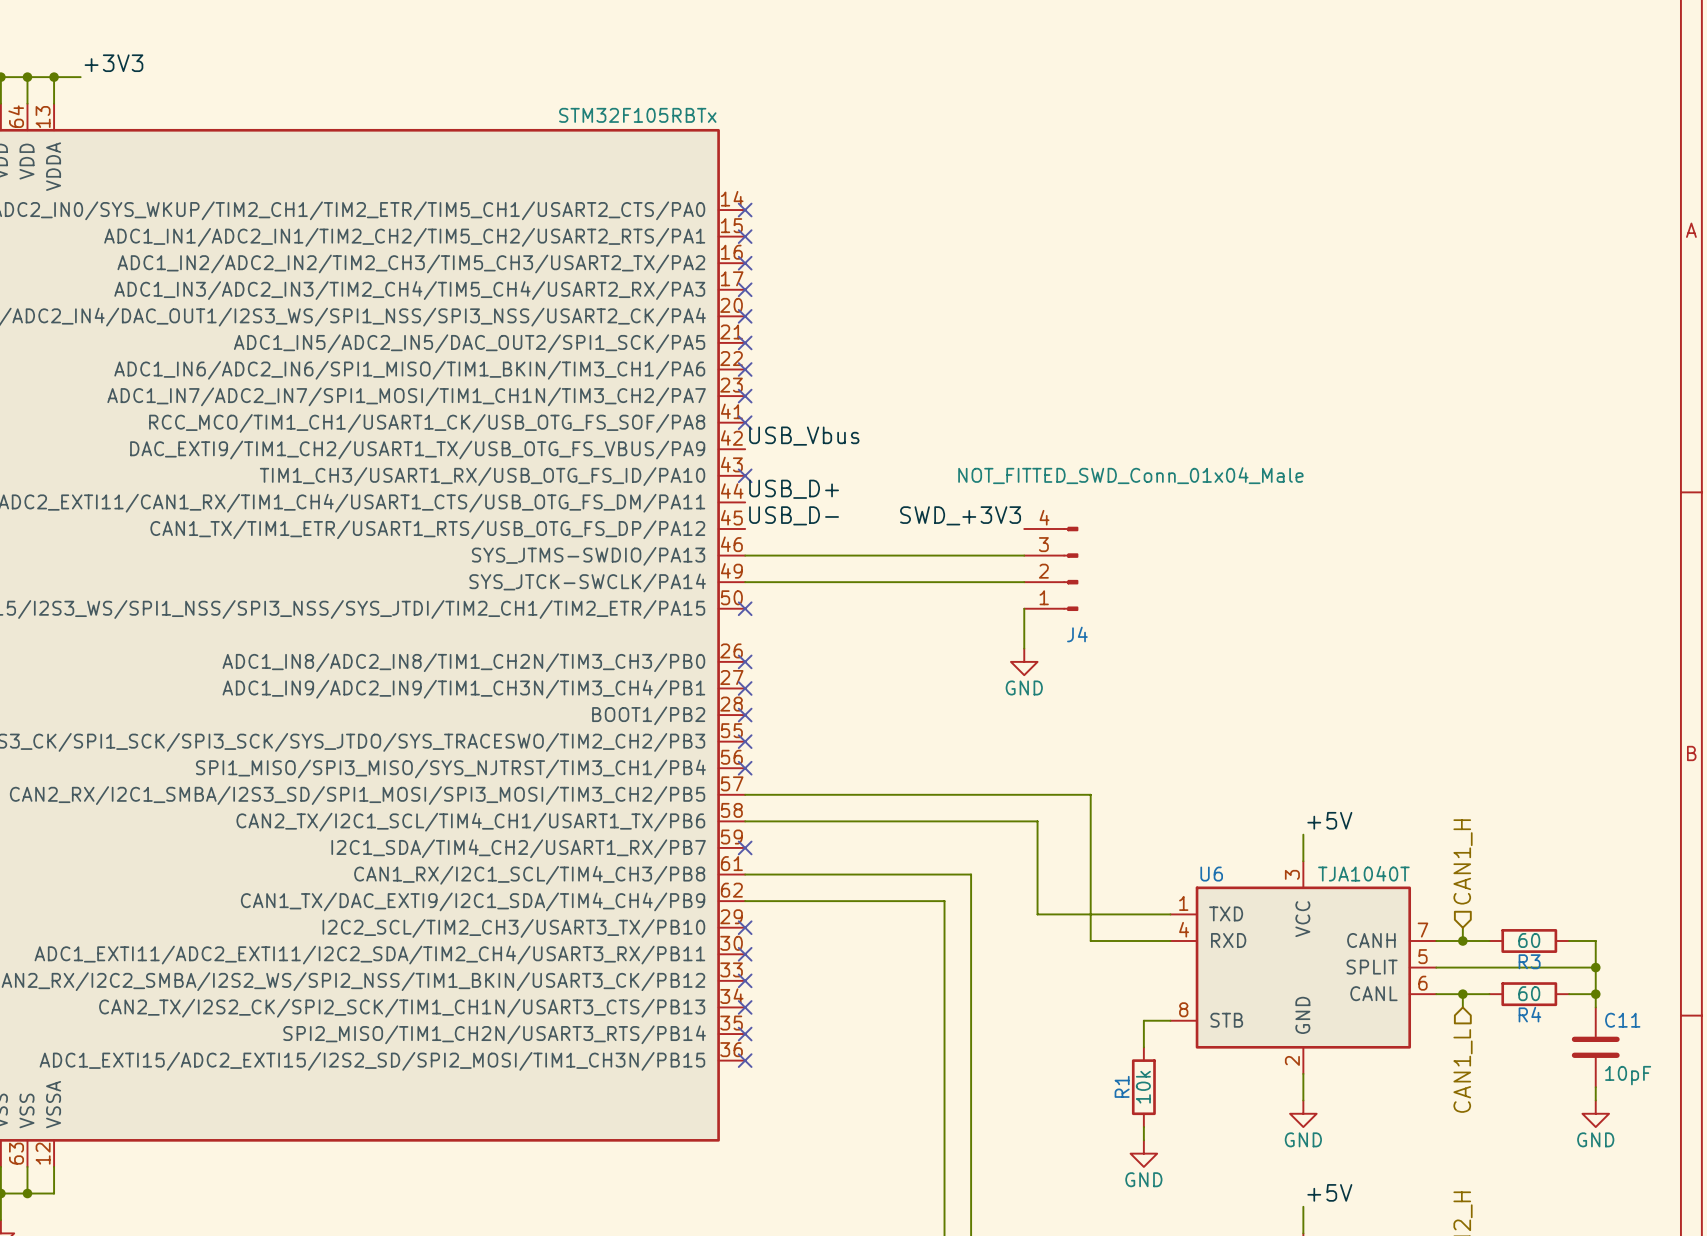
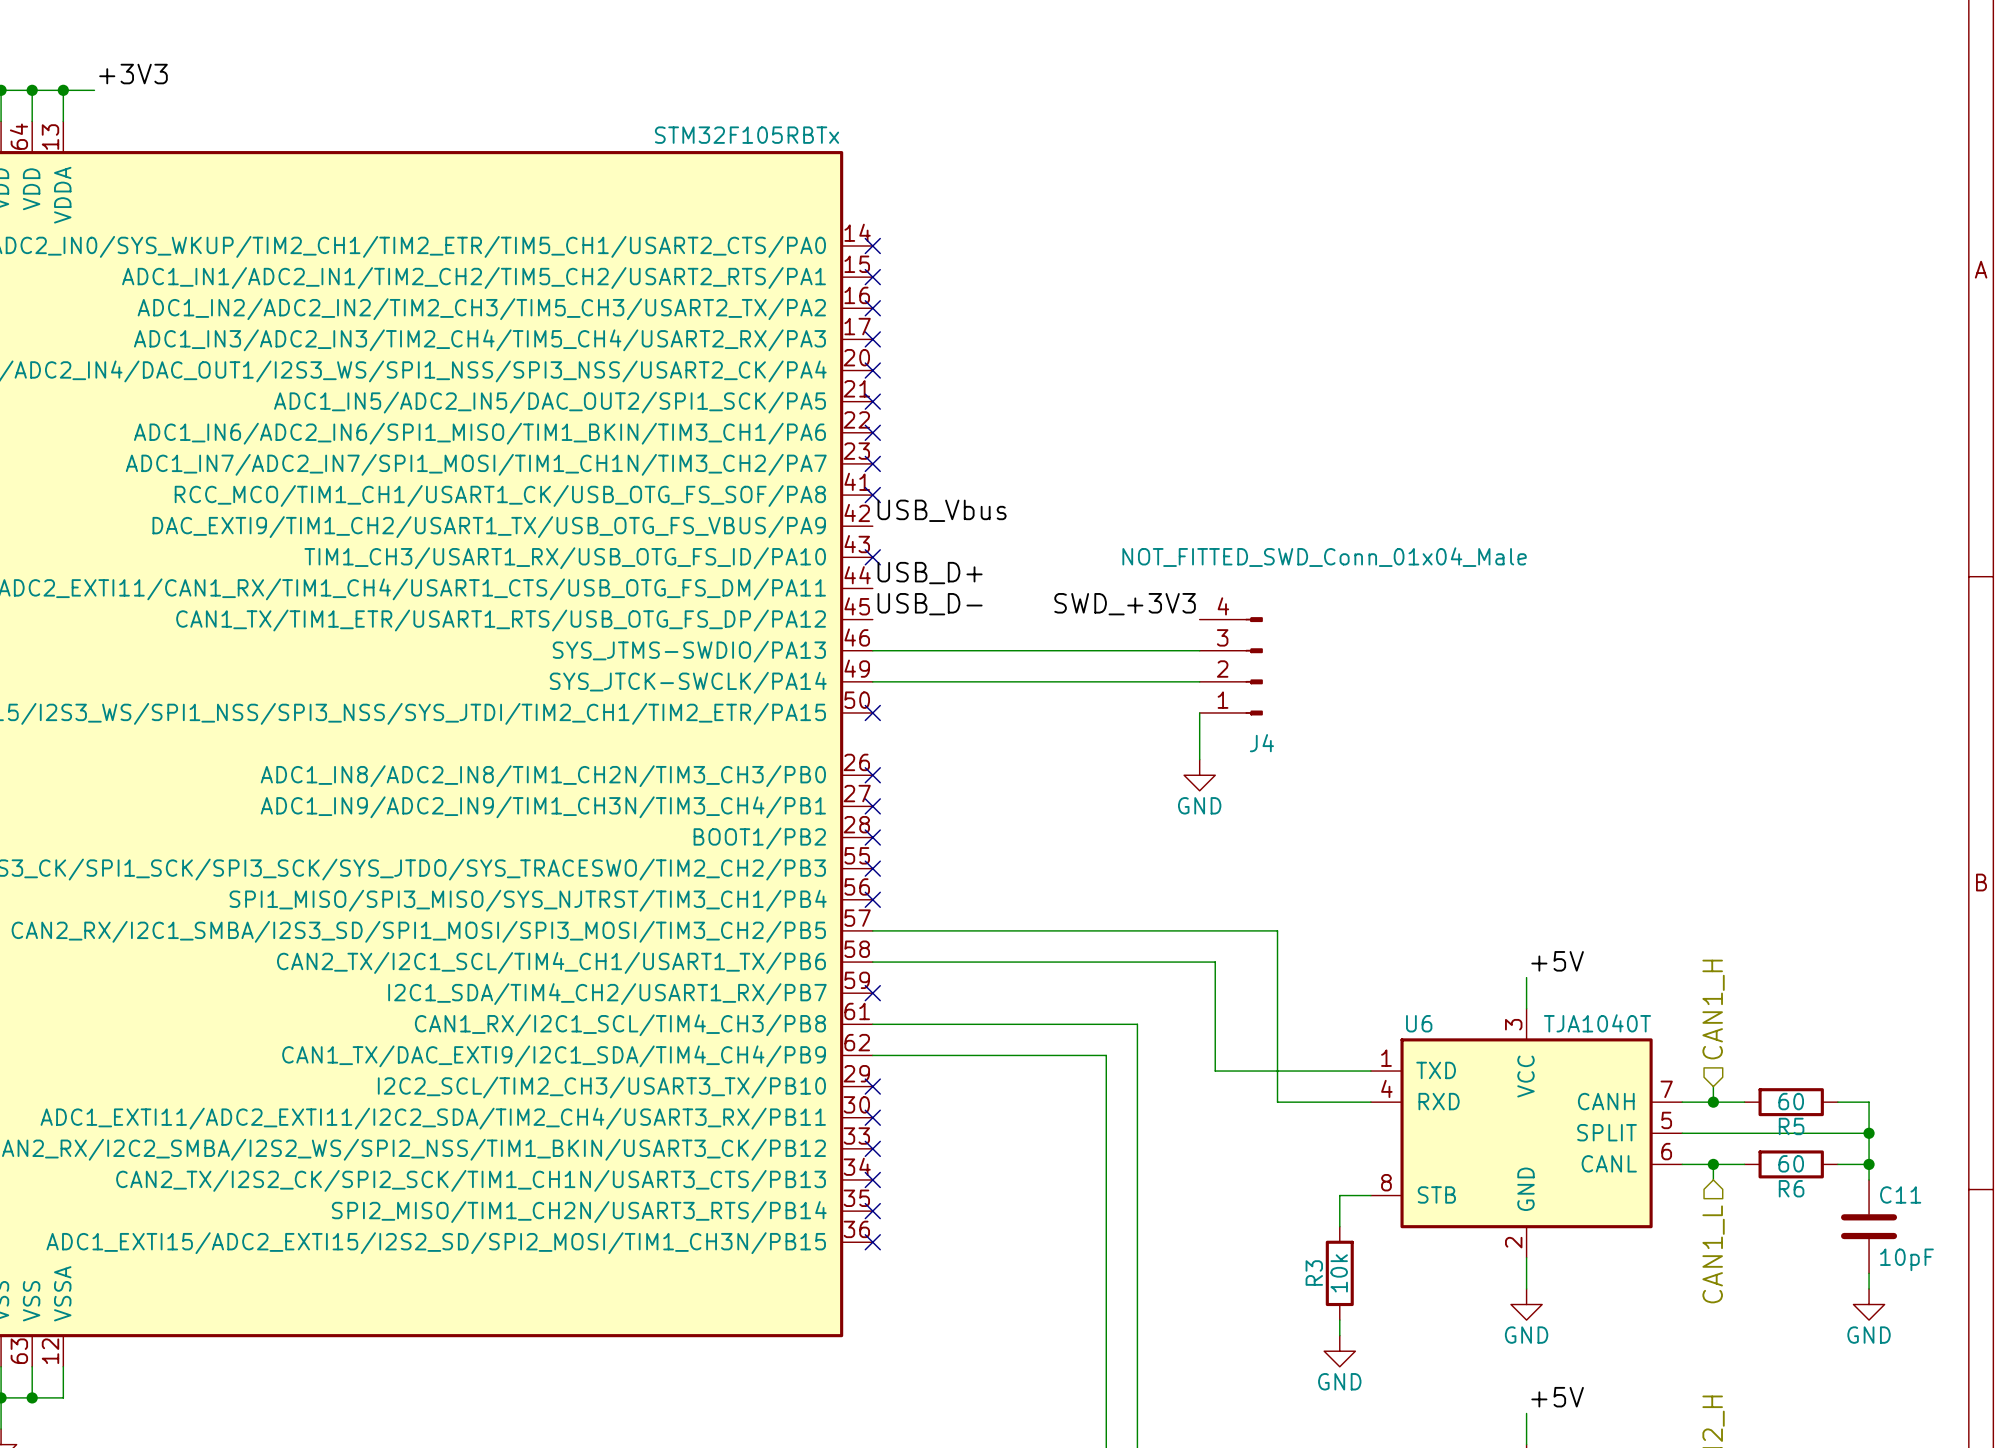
R3 name: R3 (1529, 961) -> R5 (1791, 1126)
R4 name: R4 (1529, 1014) -> R6 (1791, 1188)
R1 name: R1 (1122, 1086) -> R3 (1314, 1273)

